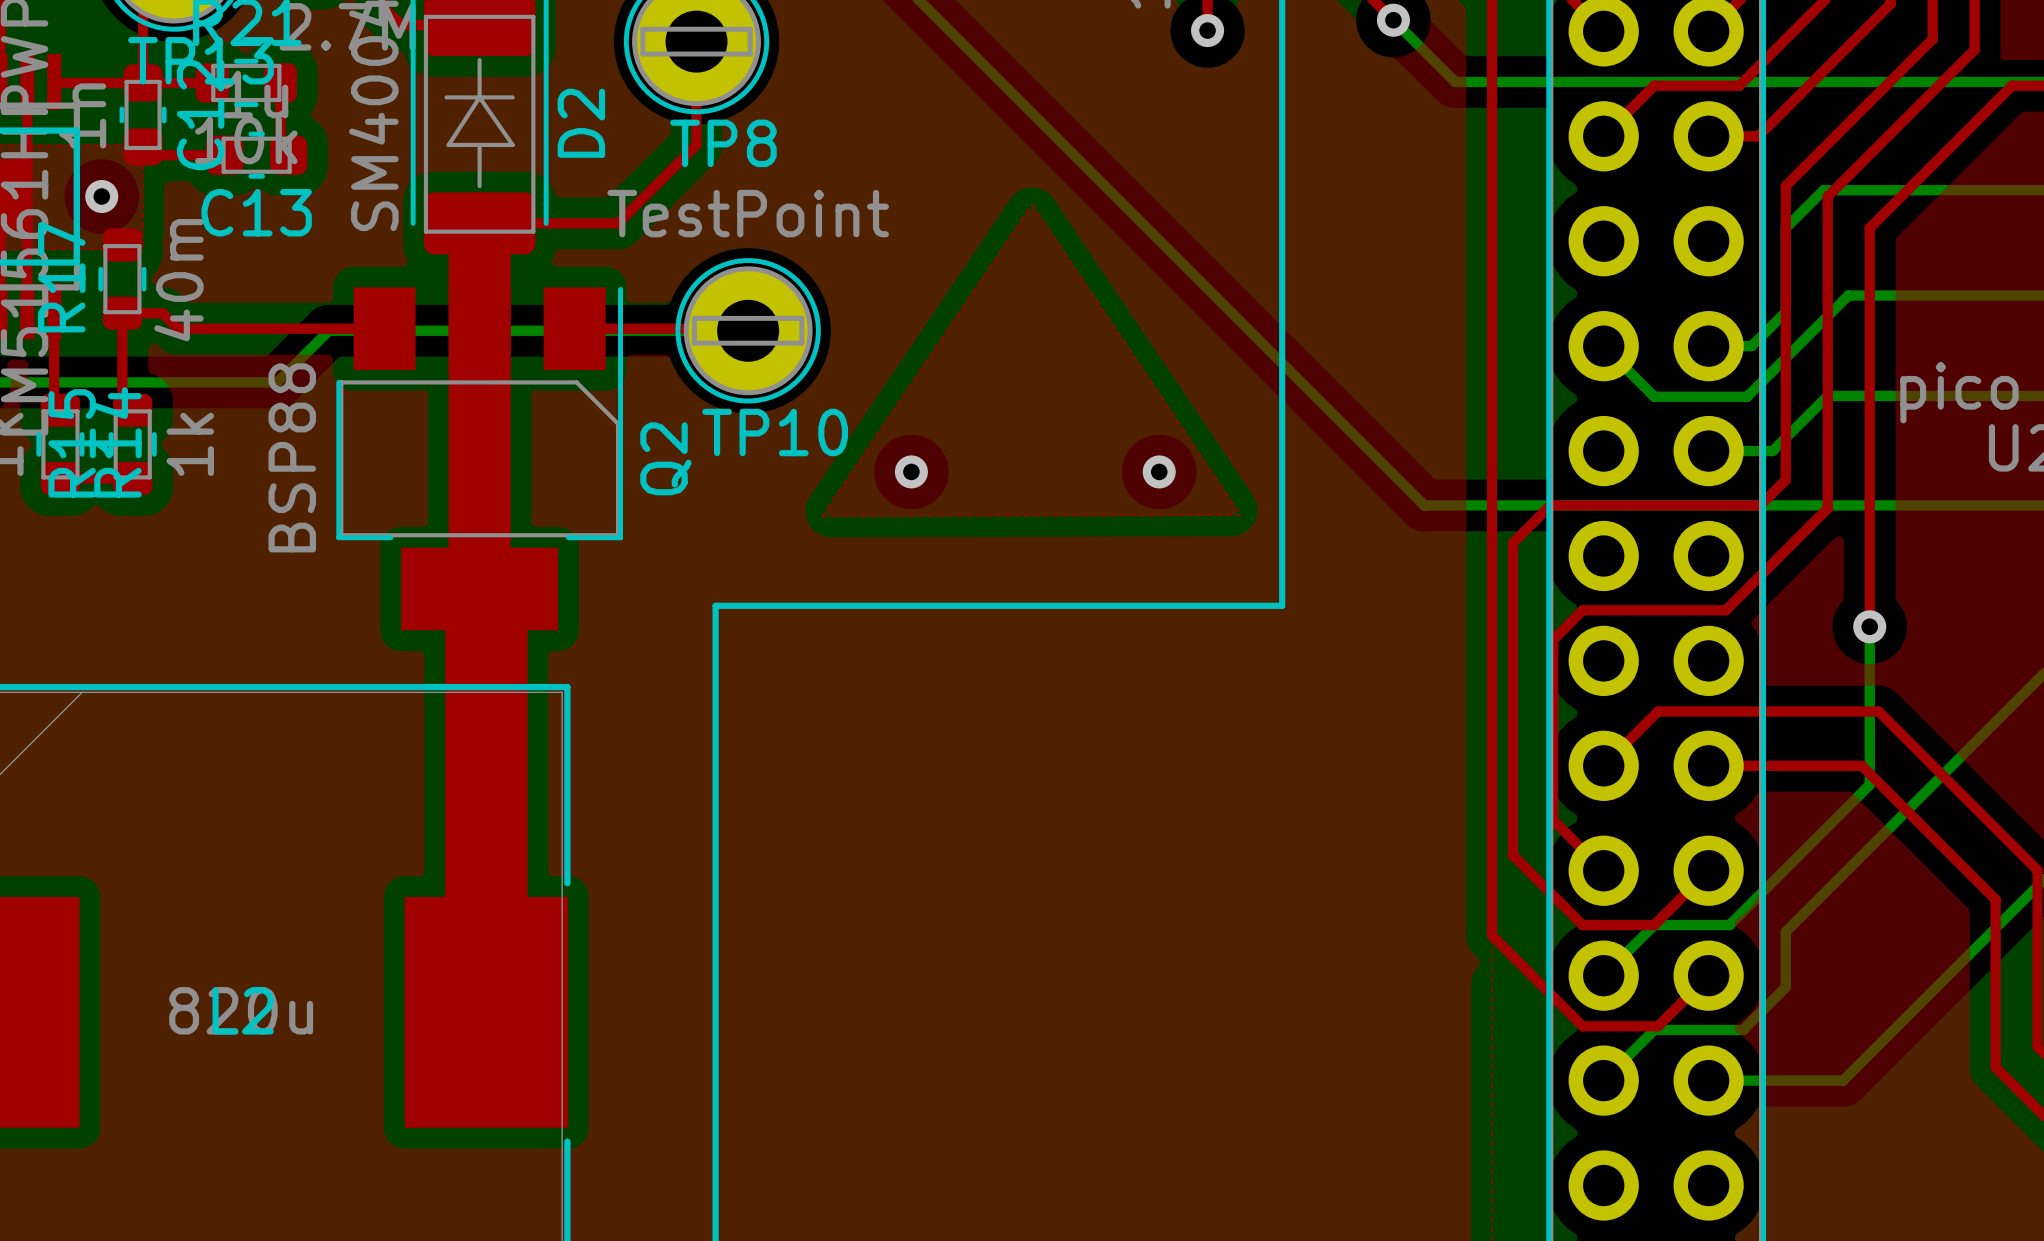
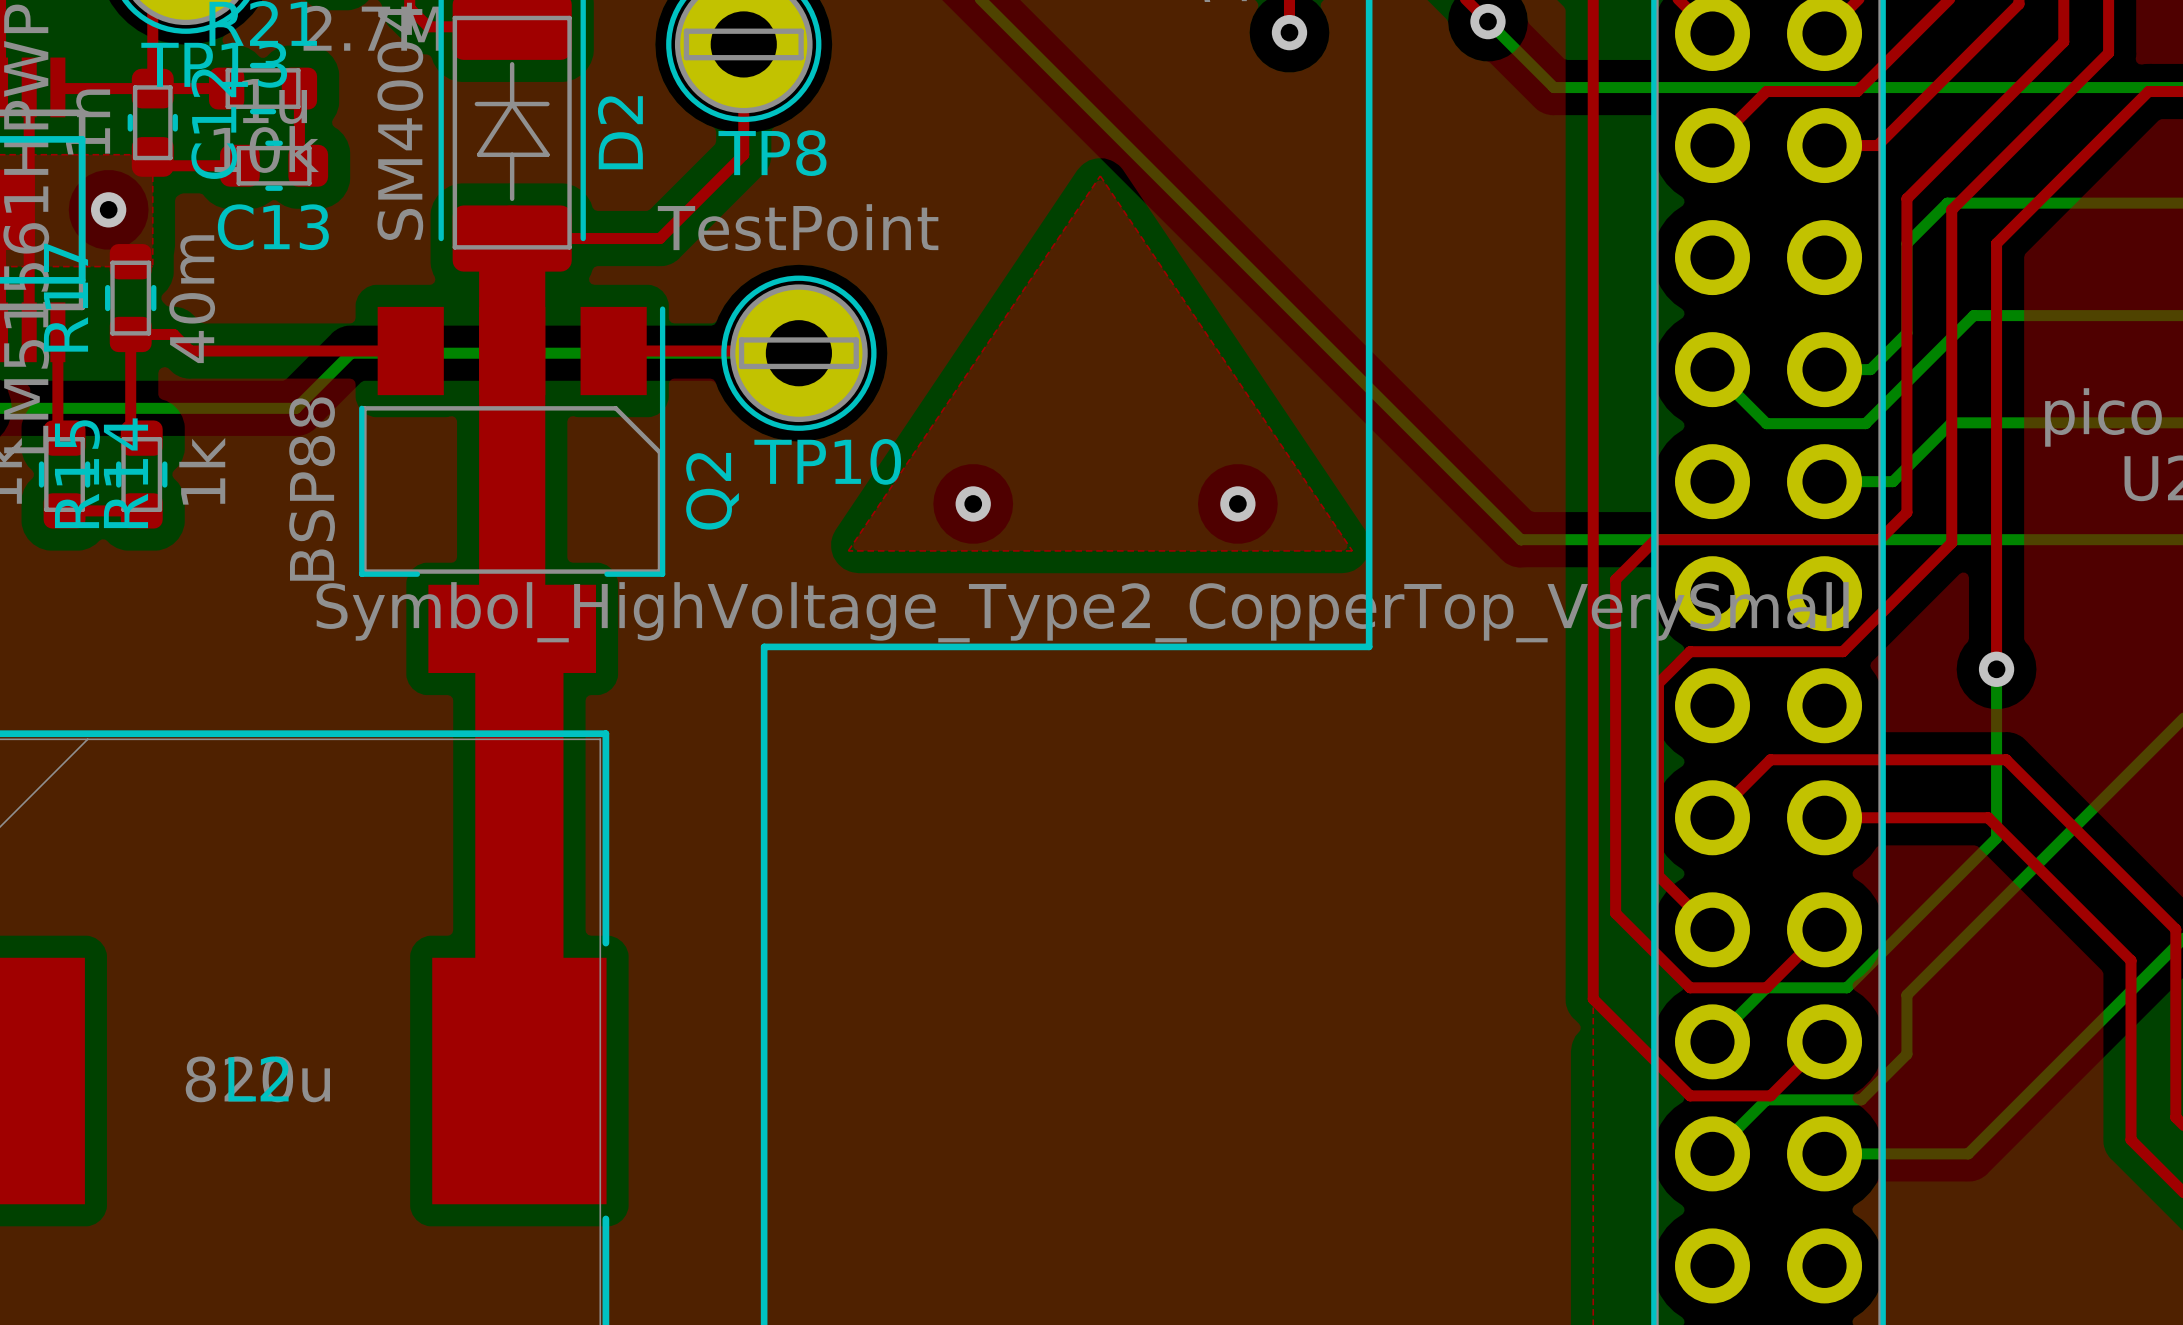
top zone outline: (1032, 204) (821, 516) (1241, 515) (1032, 204) -> (1100, 175) (848, 550) (1352, 550) (1100, 175)
drawing: none -> [316, 582, 1849, 643]

